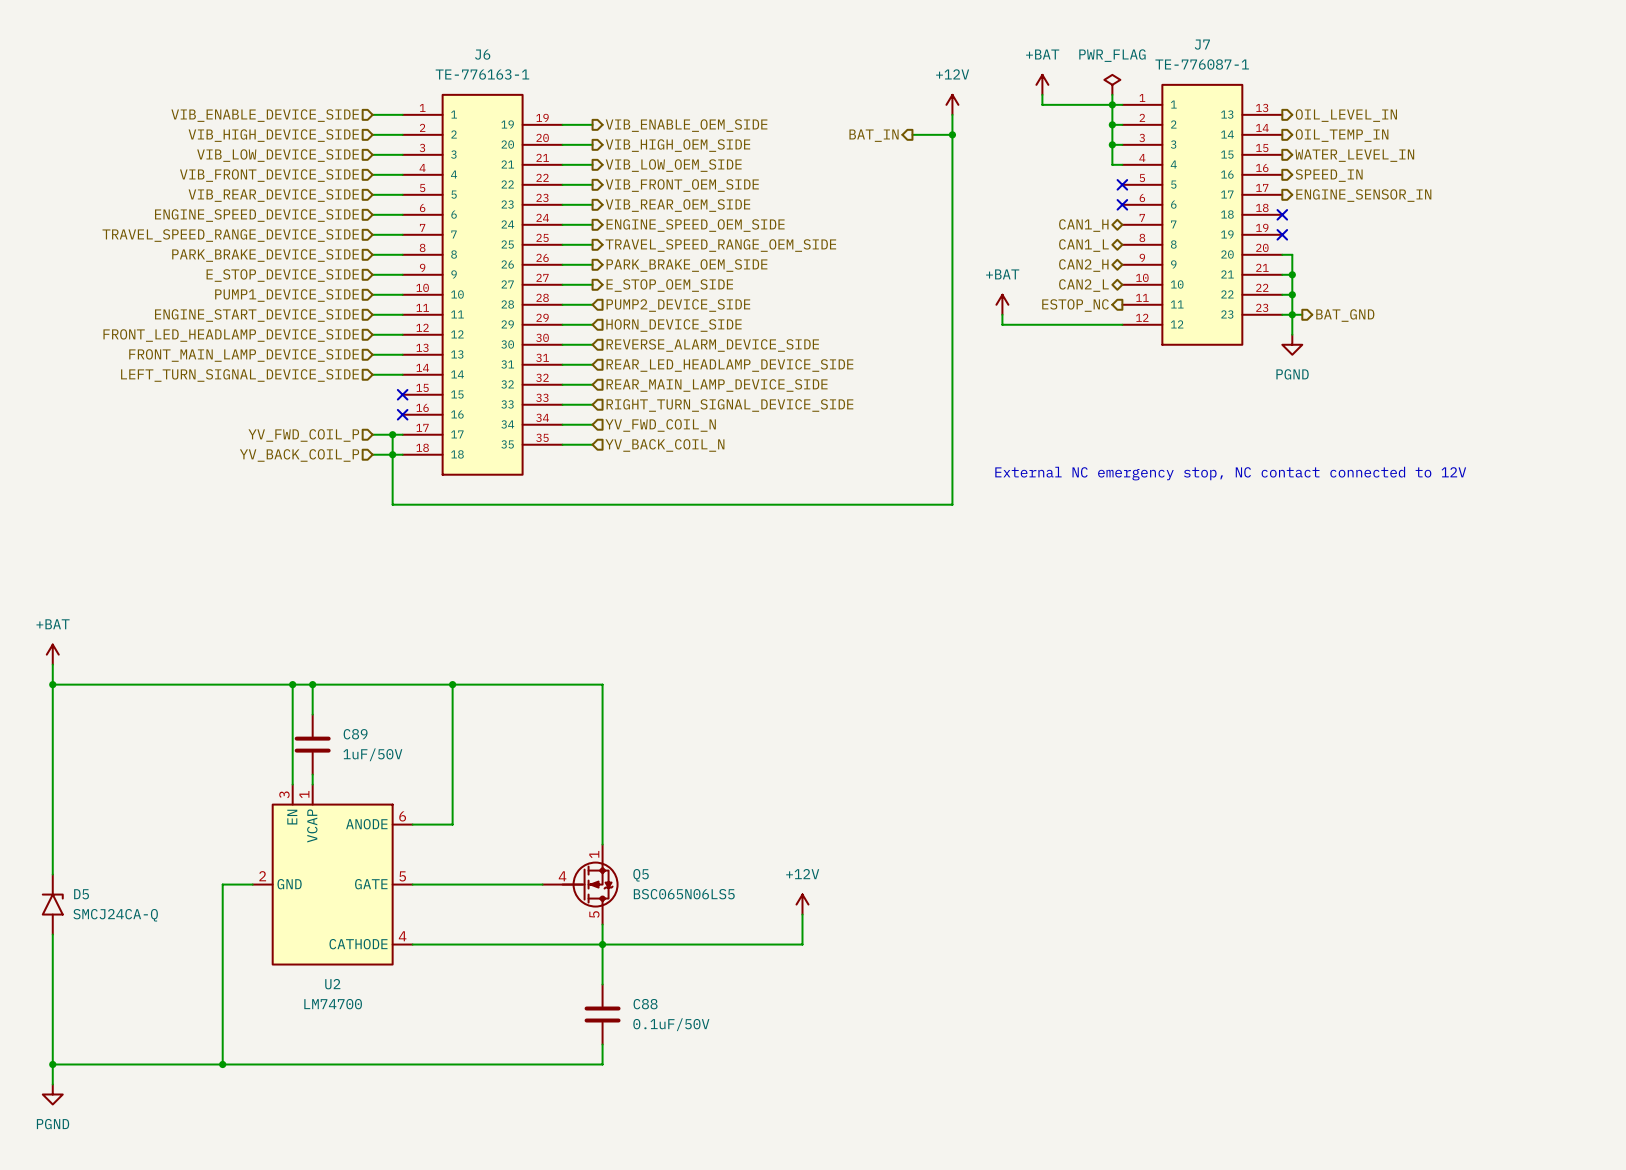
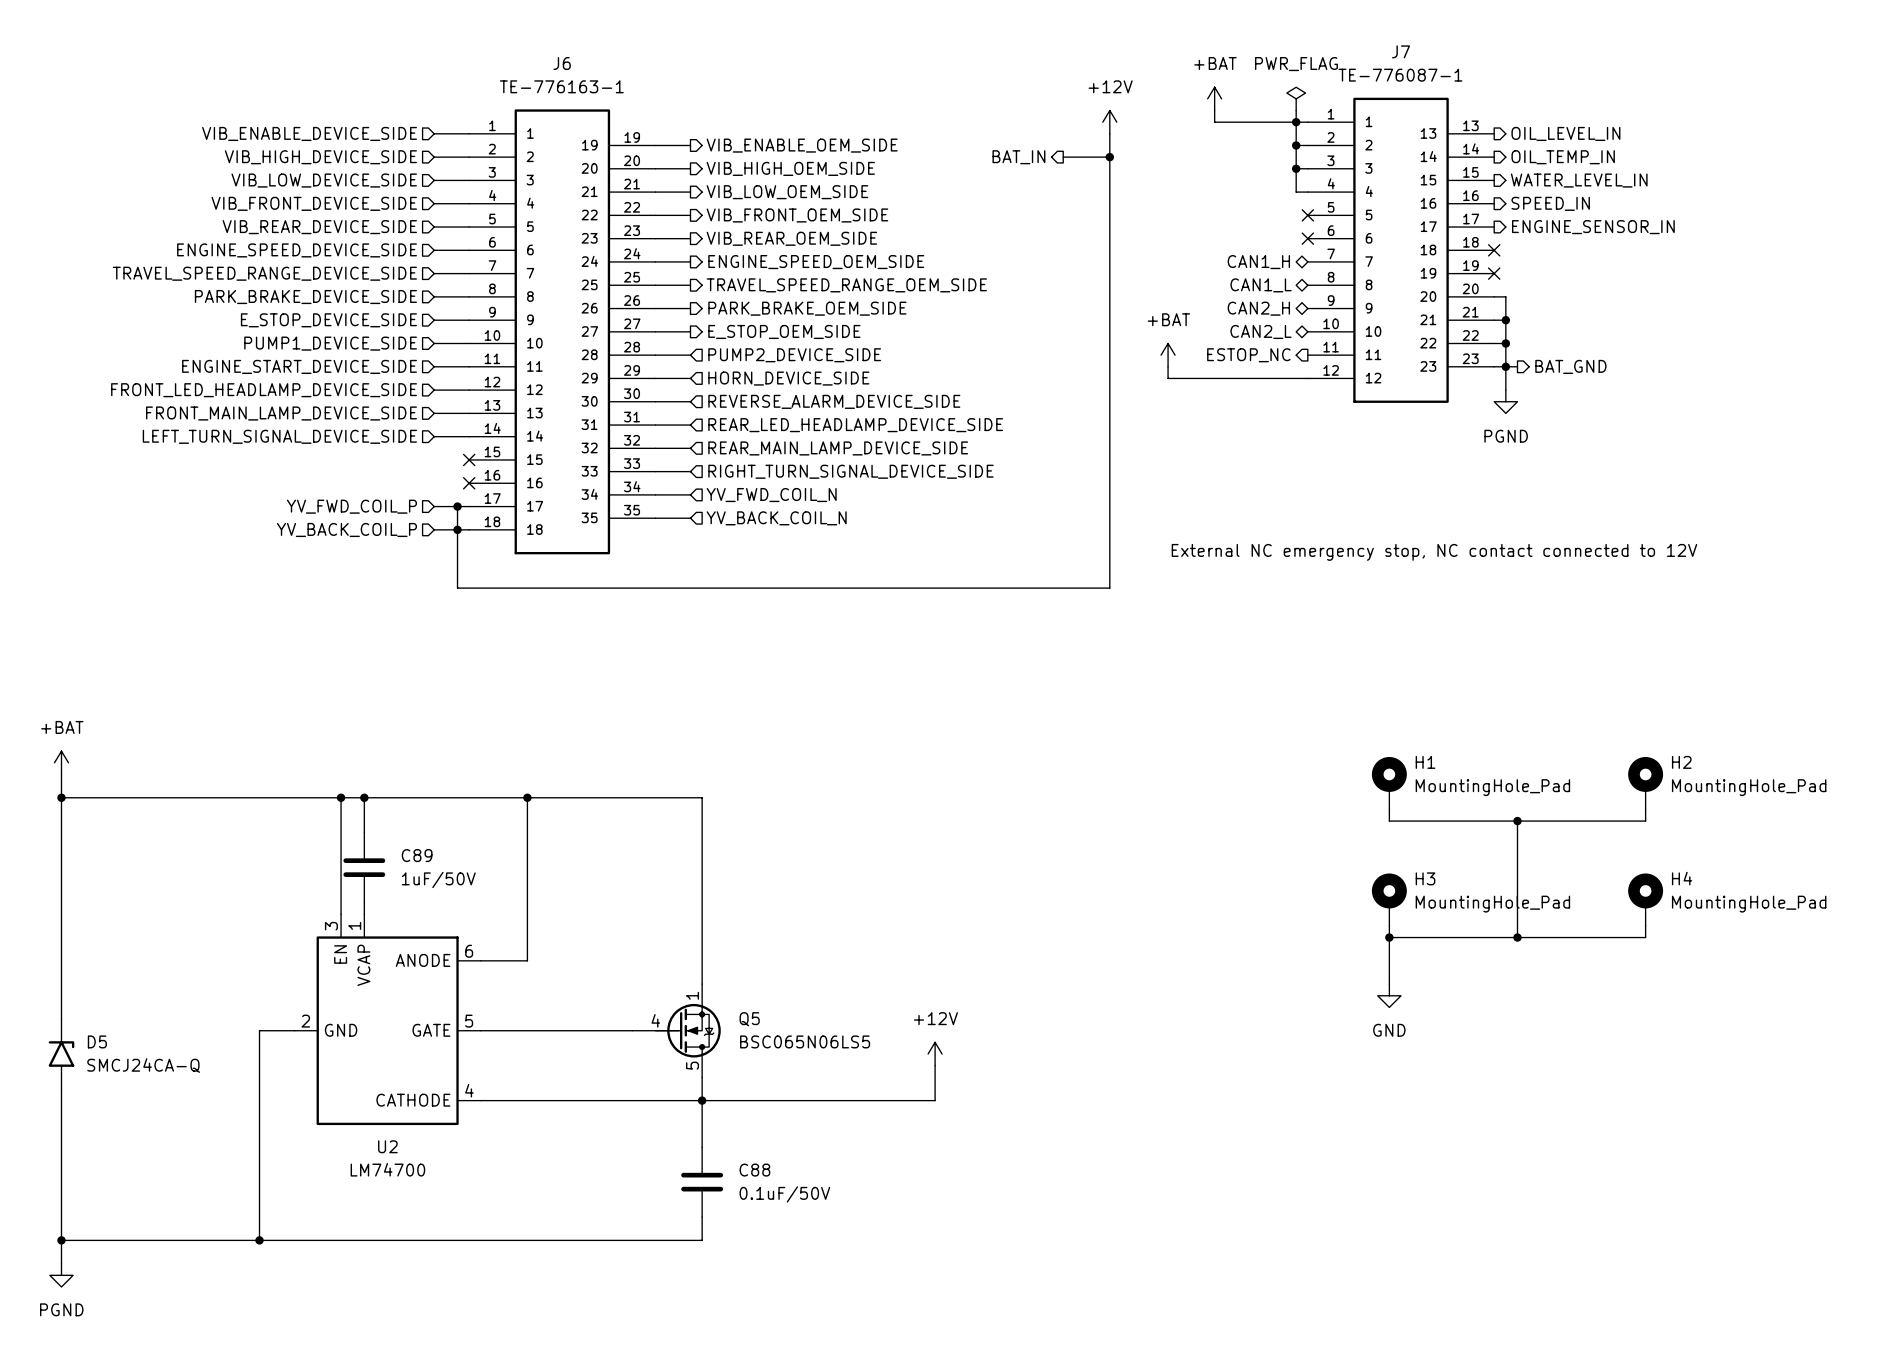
H1: none -> MountingHole_Pad (1389, 783)
H2: none -> MountingHole_Pad (1645, 783)
wire: none -> (1389, 809) (1389, 821) (1645, 821) (1645, 809)
wire: none -> (1517, 821) (1517, 937)
junction: none -> (1517, 821)
H3: none -> MountingHole_Pad (1389, 899)
H4: none -> MountingHole_Pad (1645, 899)
wire: none -> (1389, 925) (1389, 984)
wire: none -> (1645, 925) (1645, 937) (1389, 937)
junction: none -> (1389, 937)
junction: none -> (1517, 937)
power symbol: none -> GND (1389, 995)

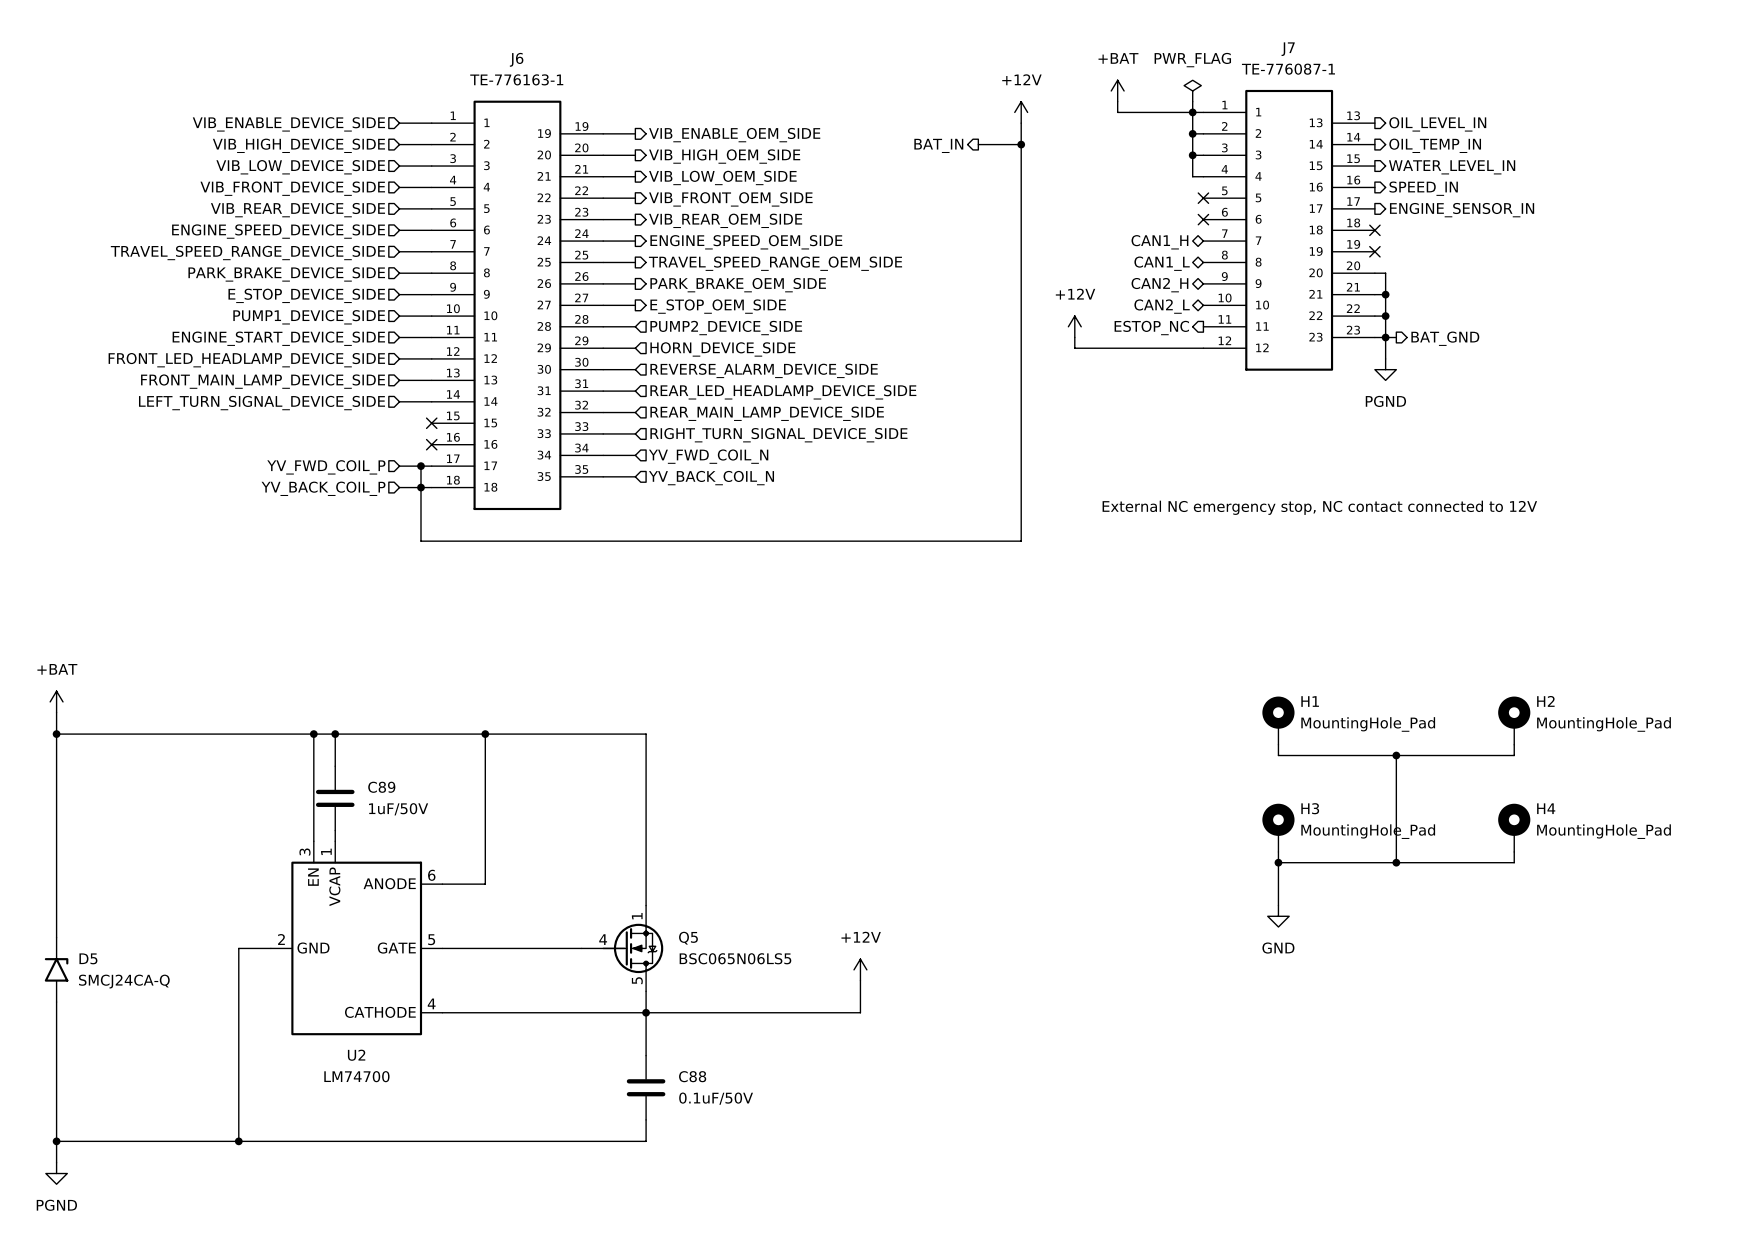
power symbol: +BAT (1168, 355) -> +12V (1074, 326)

